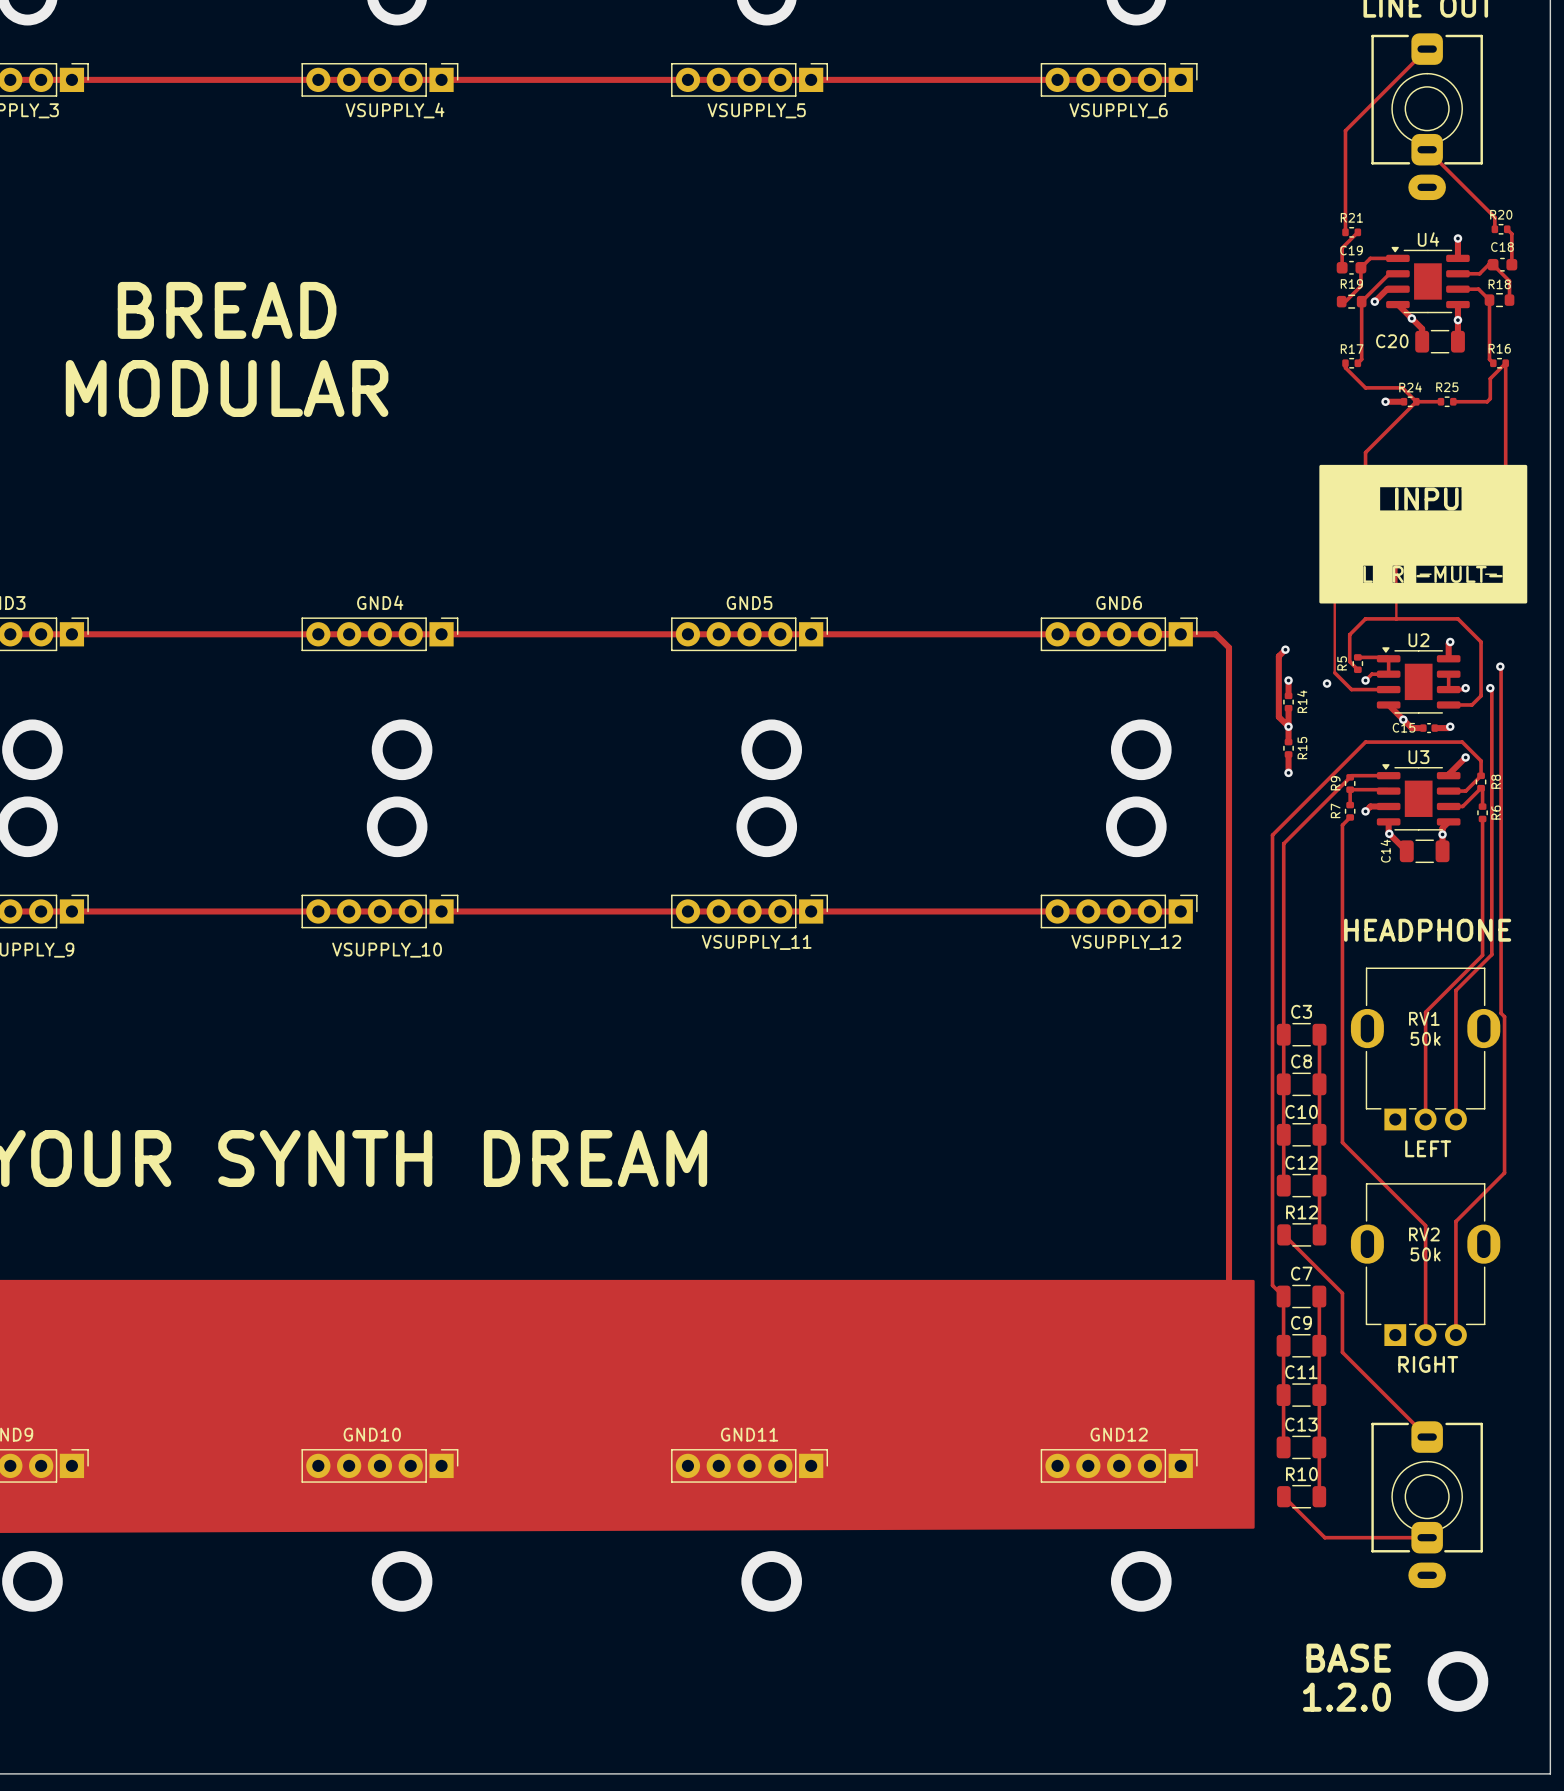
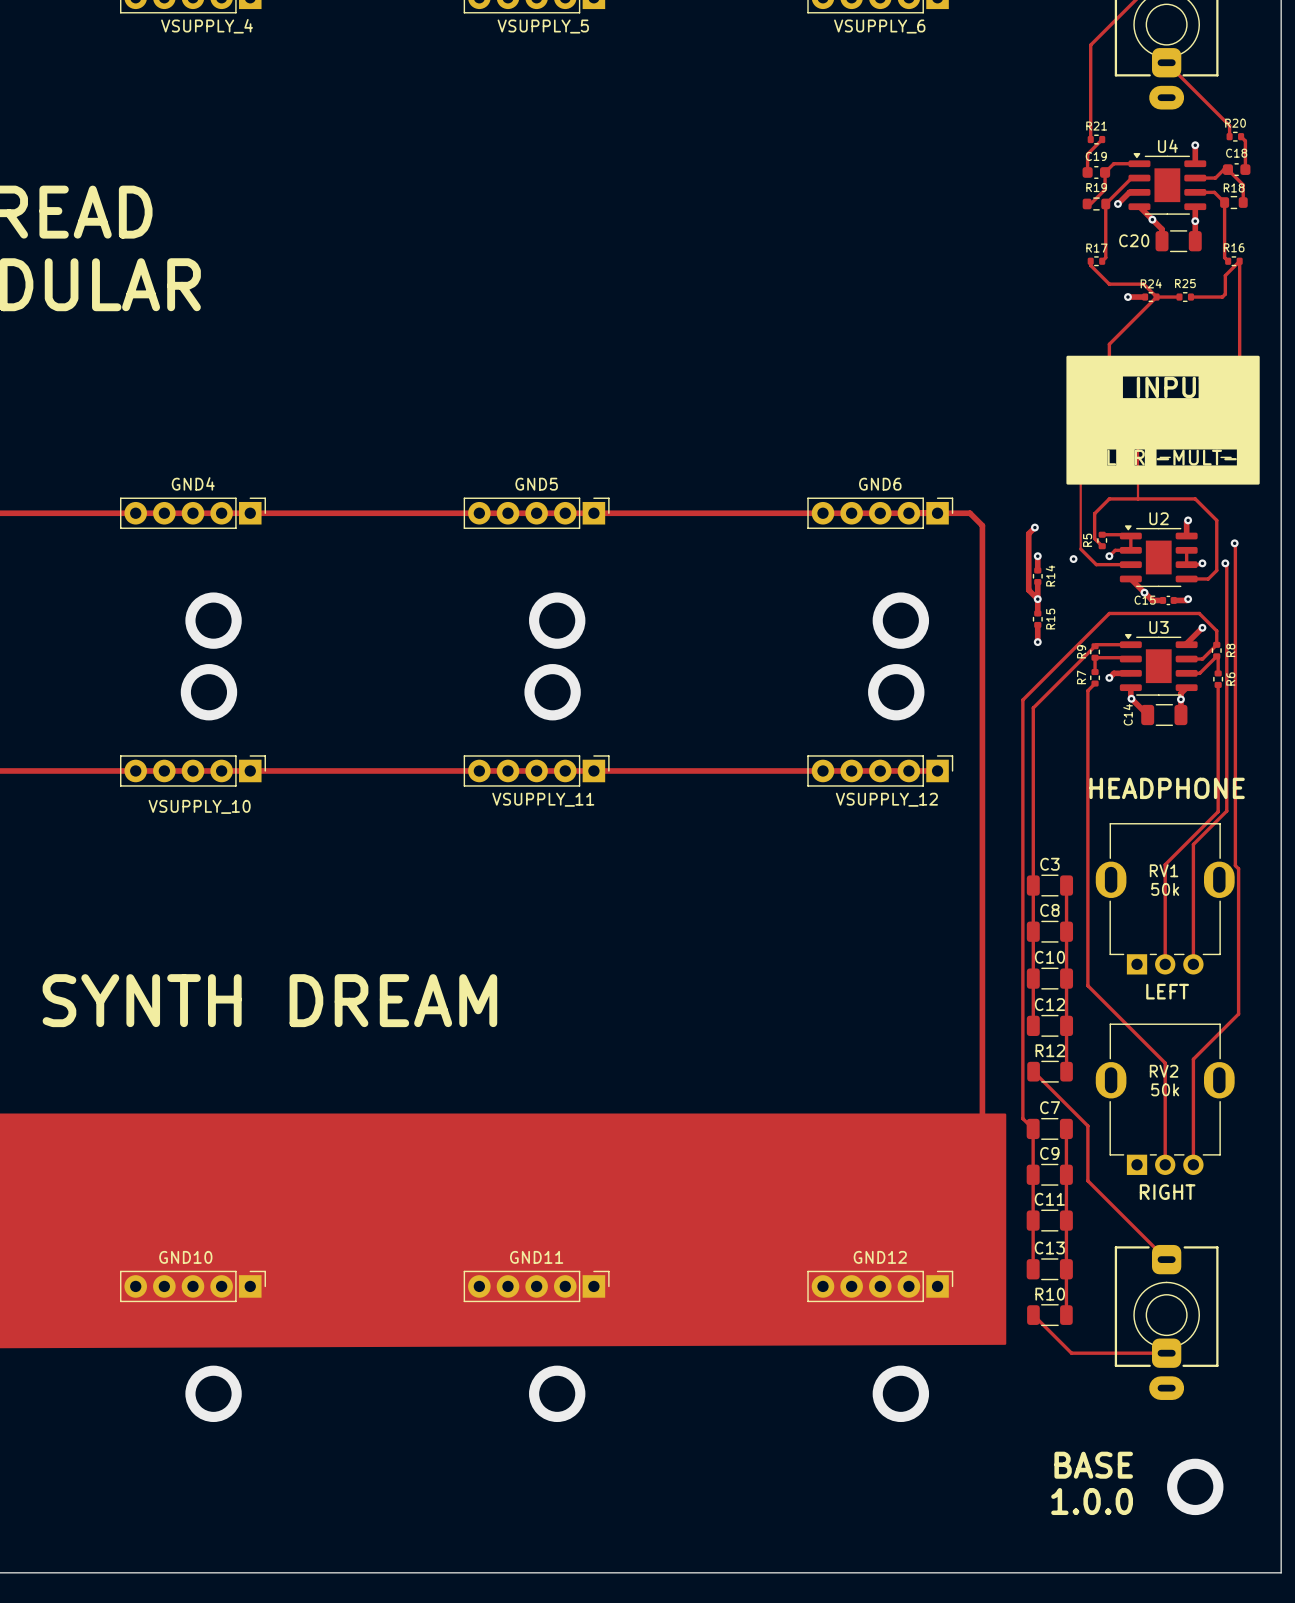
text: 1.2.0 (1346, 1697) -> 1.0.0 (1092, 1501)

